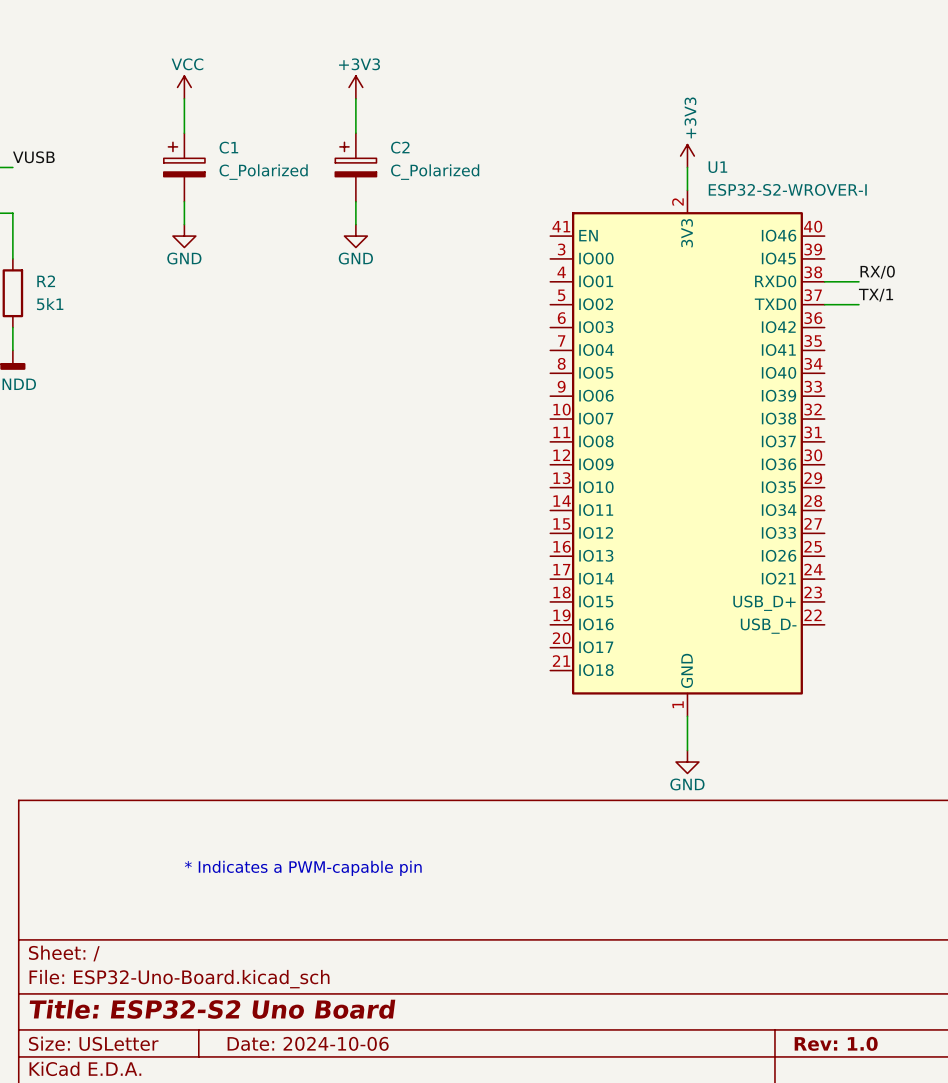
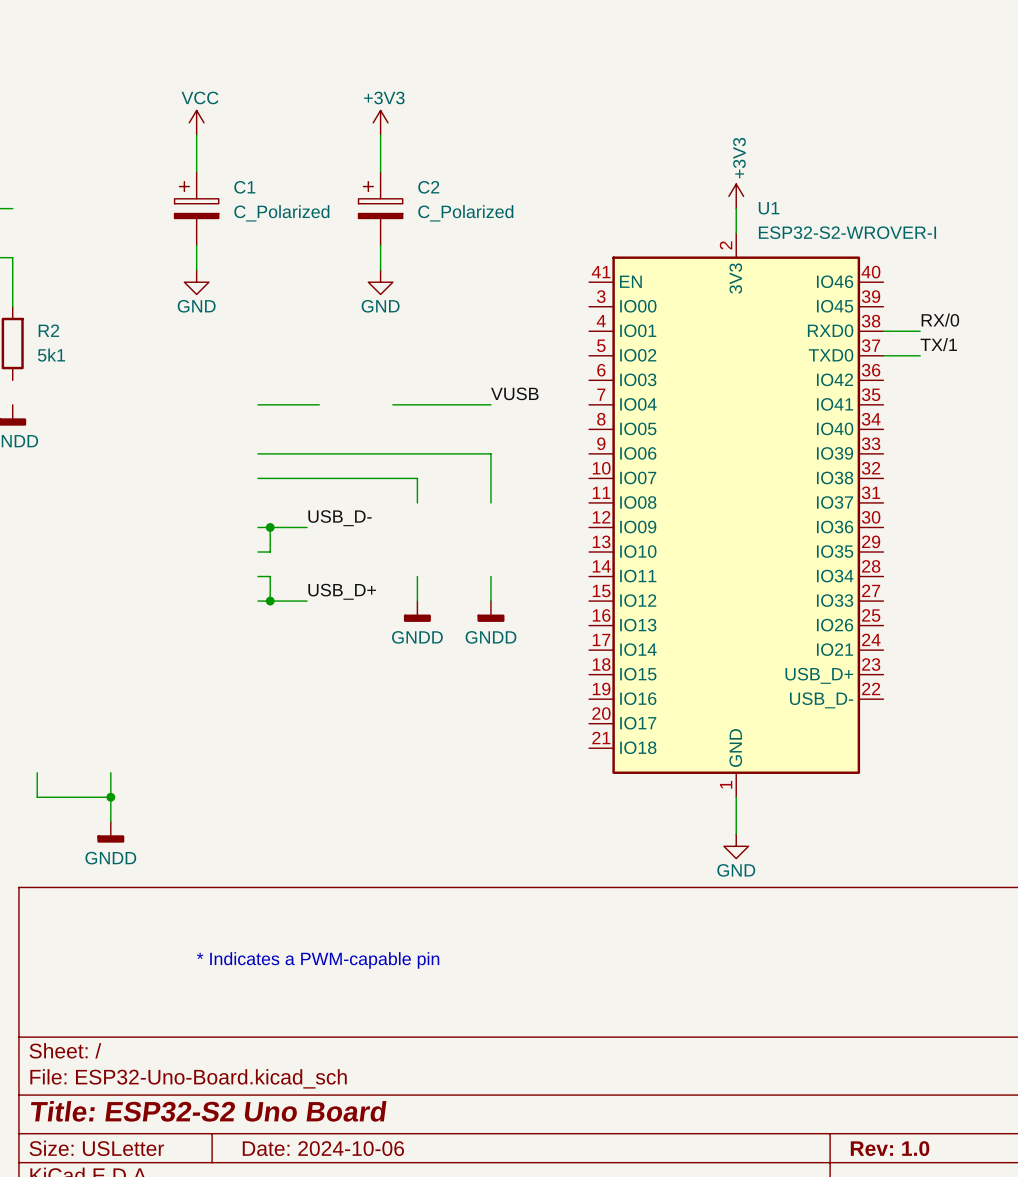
label: VUSB (33, 157) -> none
wire: (12, 327) (12, 350) -> none
label: none -> VUSB (514, 393)
wire: none -> (257, 404) (319, 404)
wire: none -> (392, 404) (490, 404)
wire: none -> (257, 453) (490, 453) (490, 502)
wire: none -> (257, 478) (417, 478) (417, 502)
label: none -> USB_D- (340, 518)
wire: none -> (257, 527) (307, 527)
wire: none -> (270, 527) (270, 552) (257, 552)
junction: none -> (270, 527)
wire: none -> (257, 576) (270, 576) (270, 601)
wire: none -> (417, 576) (417, 601)
wire: none -> (490, 576) (490, 601)
label: none -> USB_D+ (342, 591)
wire: none -> (257, 601) (307, 601)
junction: none -> (270, 601)
power symbol: none -> GNDD (417, 611)
power symbol: none -> GNDD (490, 611)
wire: none -> (37, 772) (37, 797) (110, 797)
wire: none -> (110, 772) (110, 821)
junction: none -> (110, 797)
power symbol: none -> GNDD (110, 832)

